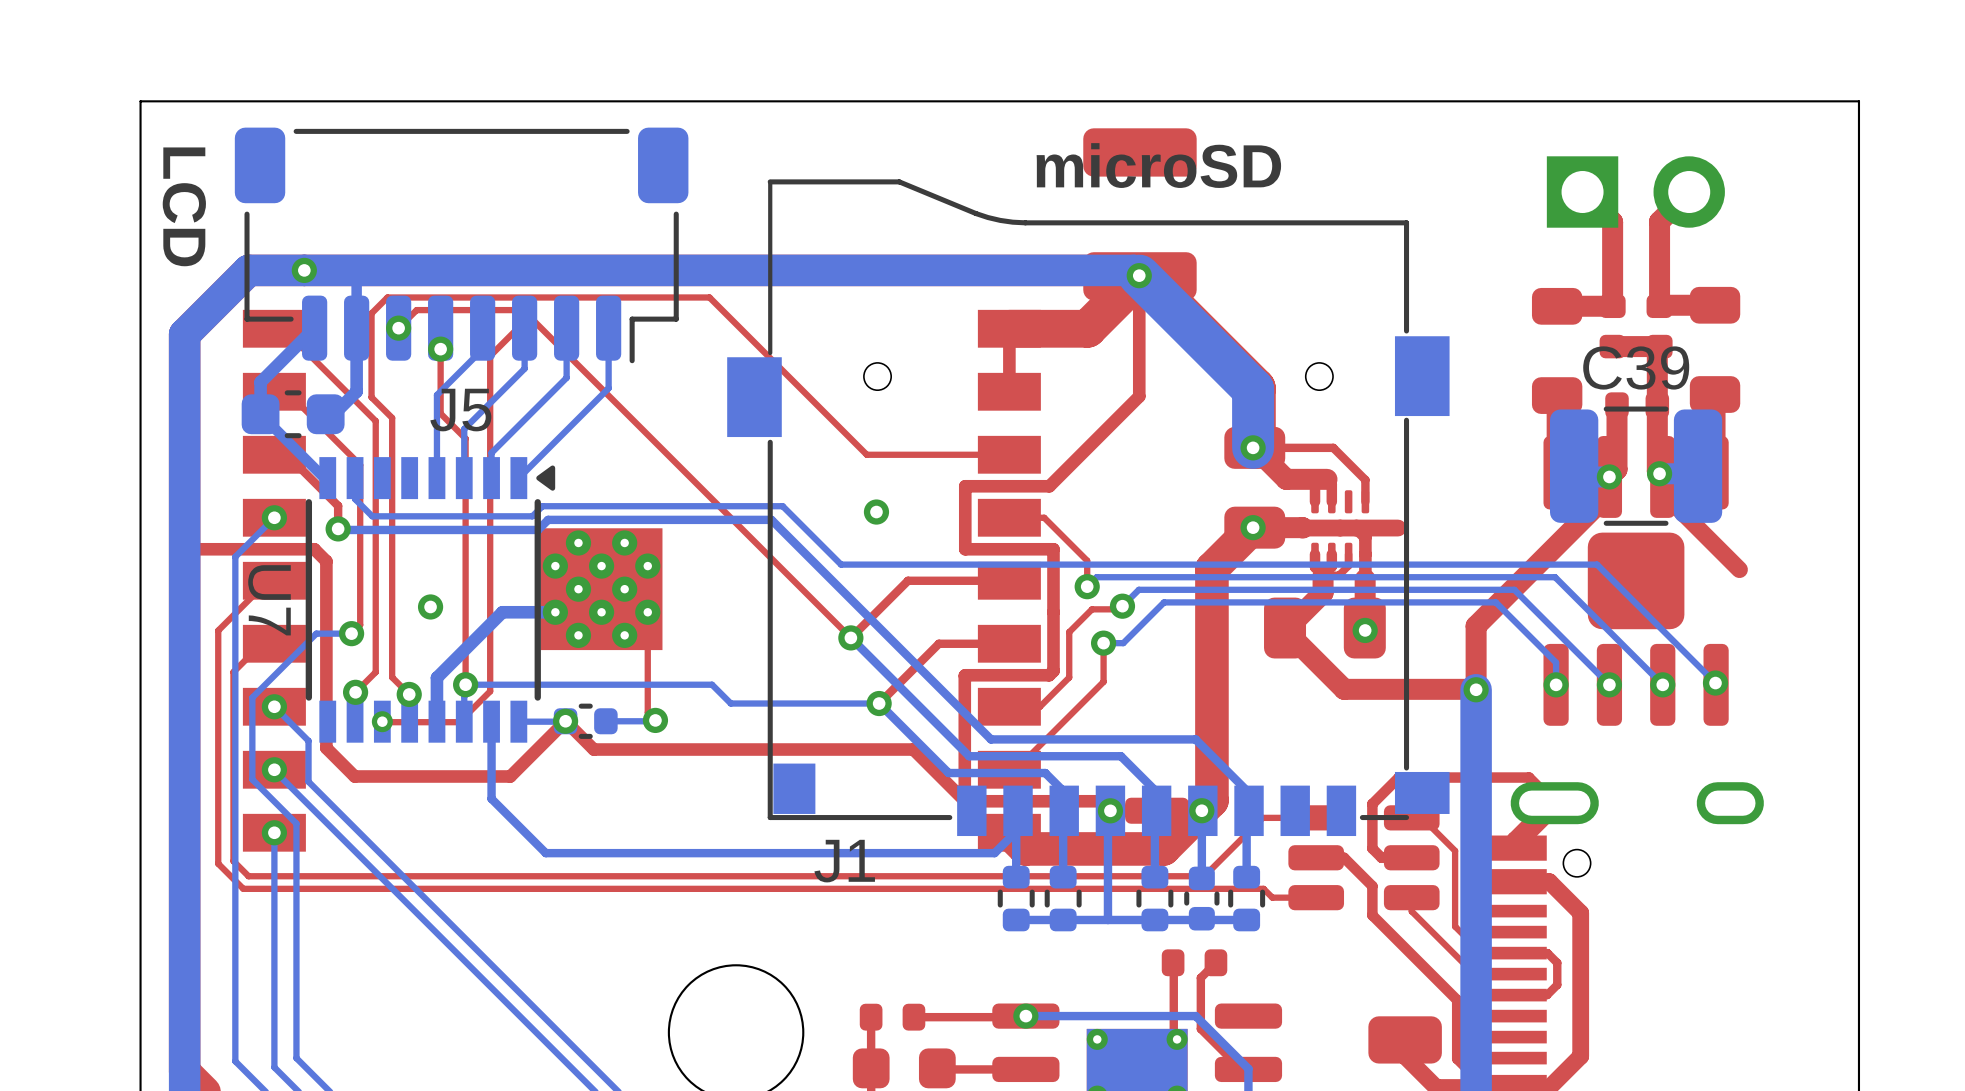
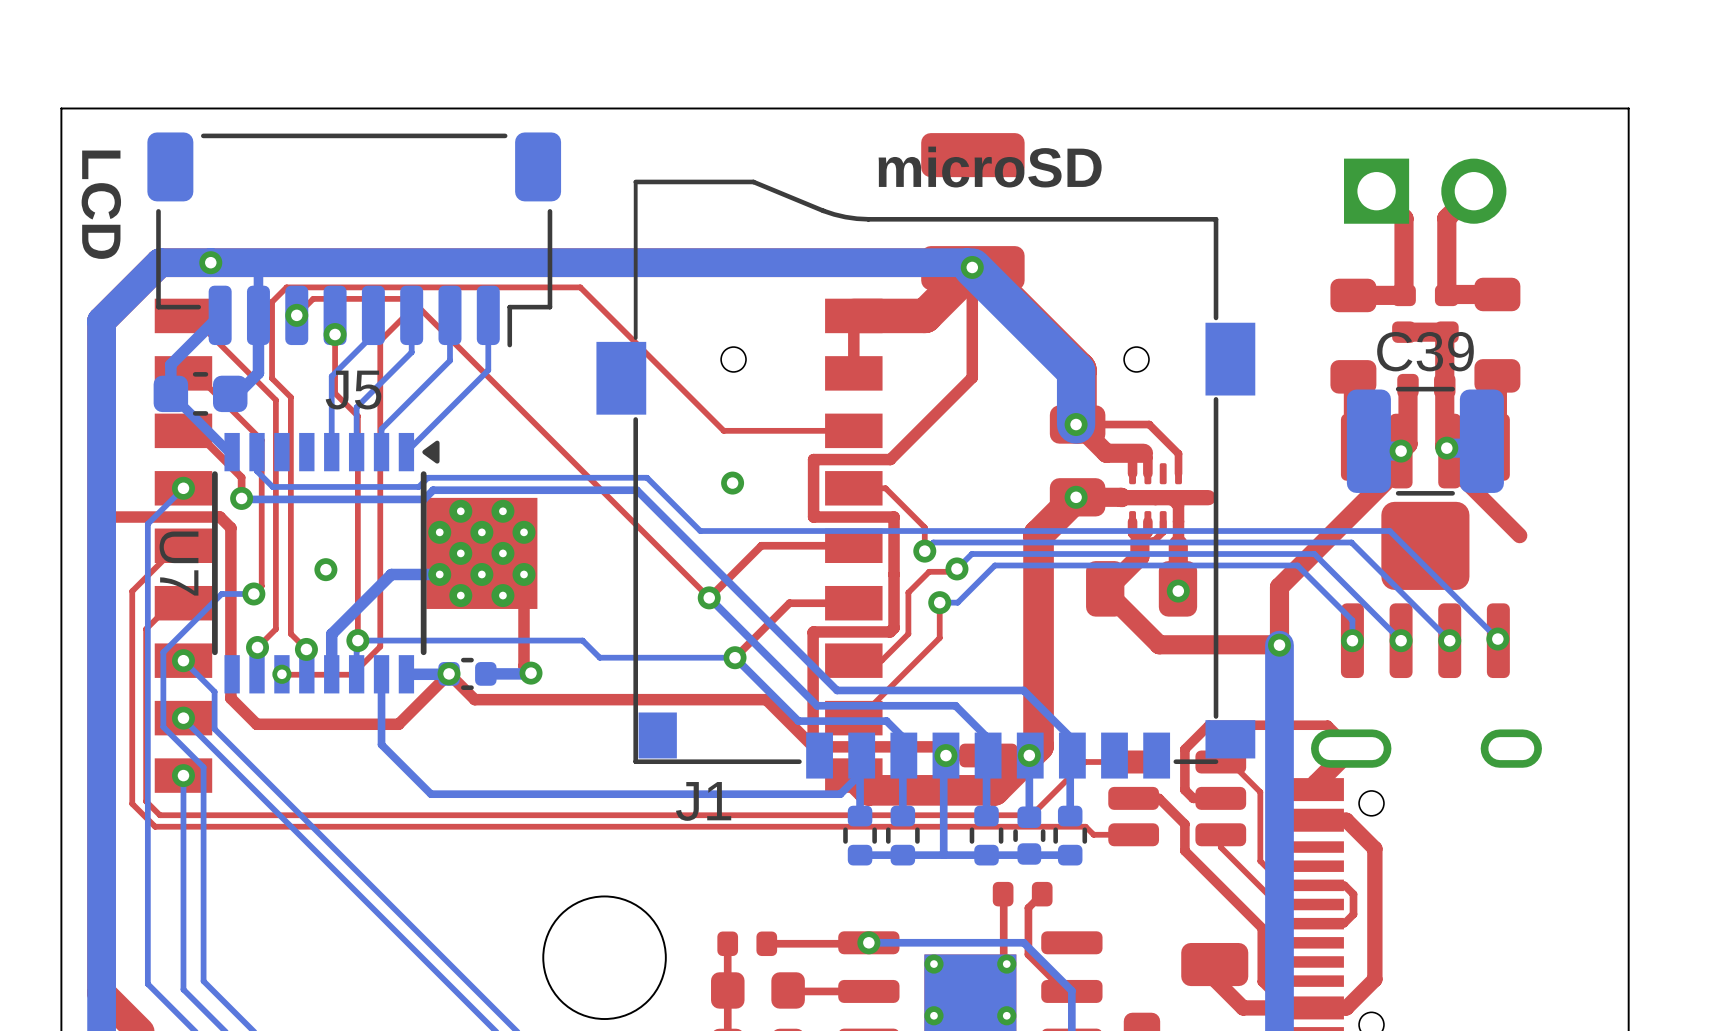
top track width: thin (647, 612) (647, 712) (655, 720) -> thick (524, 574) (524, 666) (531, 673)
bottom track width: thin (565, 721) (518, 721) -> thick (448, 674) (406, 674)
bottom track width: thin (654, 721) (605, 721) -> thick (530, 673) (485, 673)

